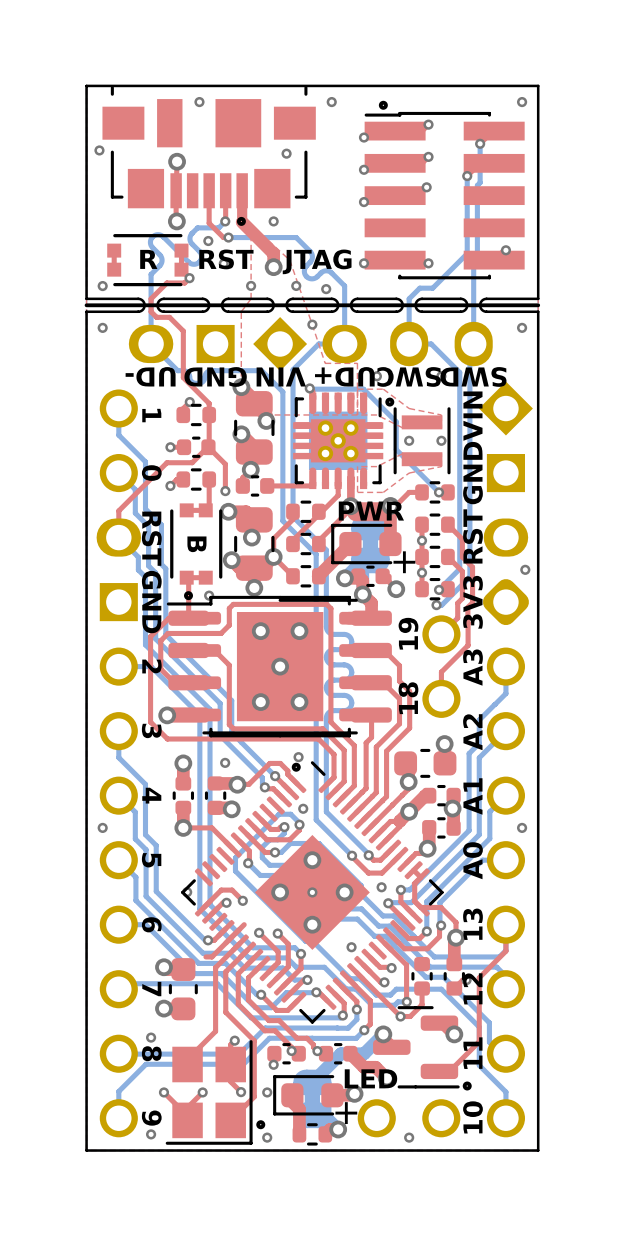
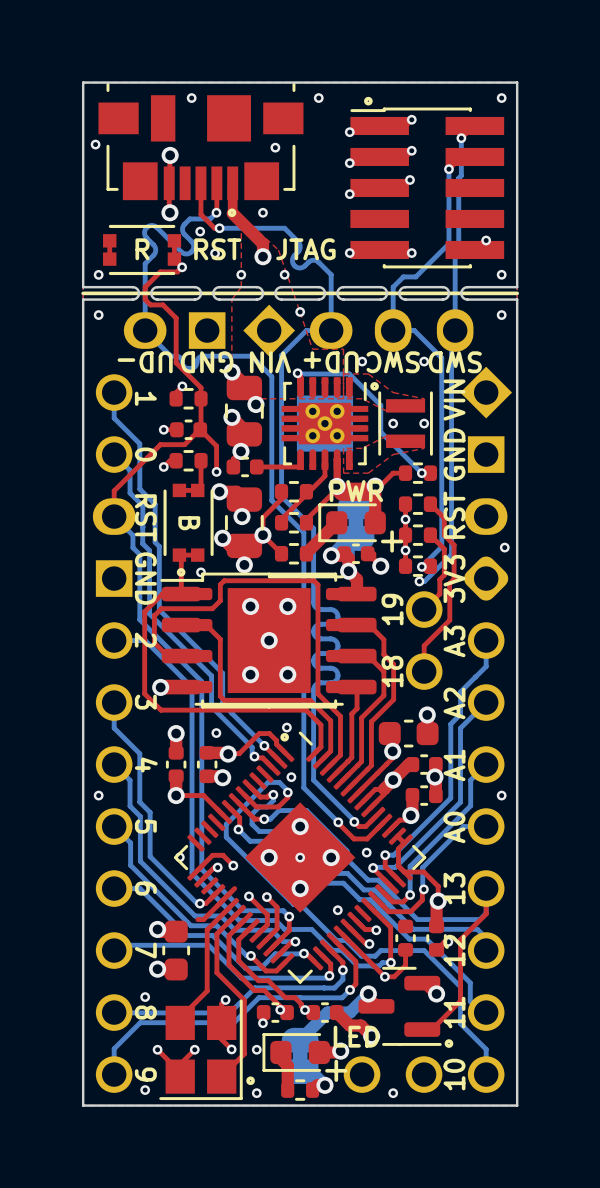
via: none -> (501, 274)
via: (326, 289) -> none

